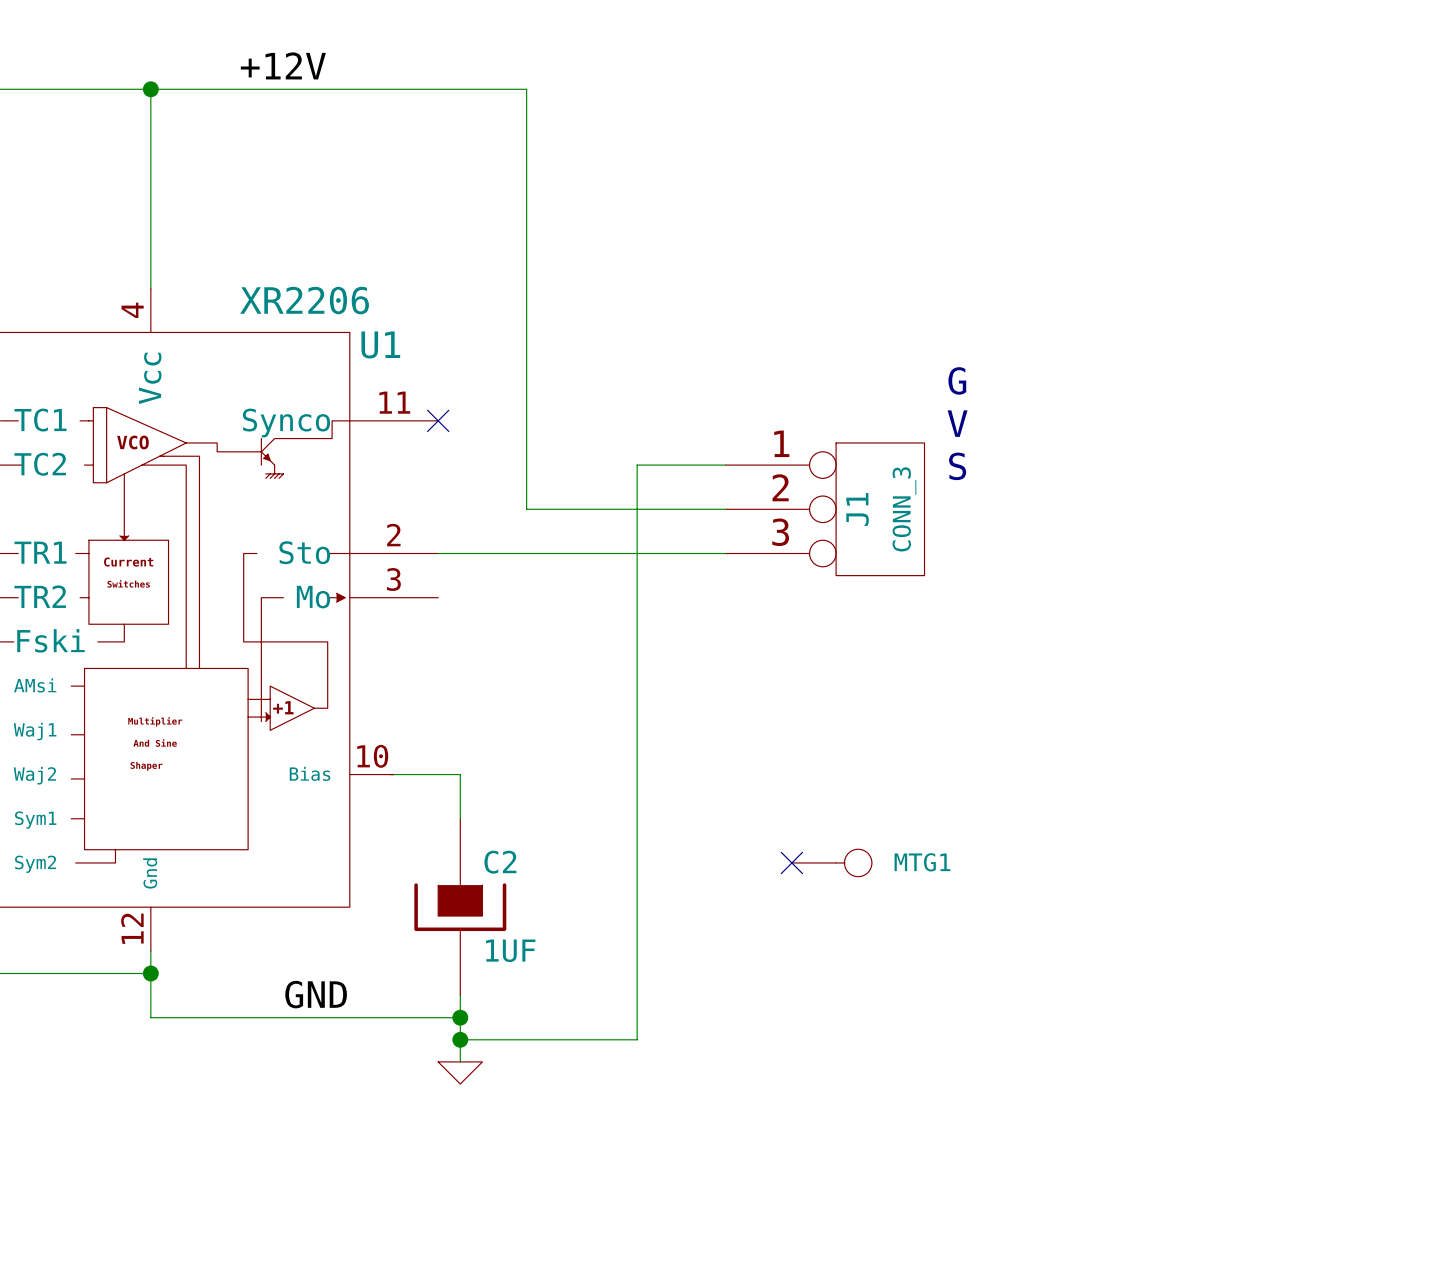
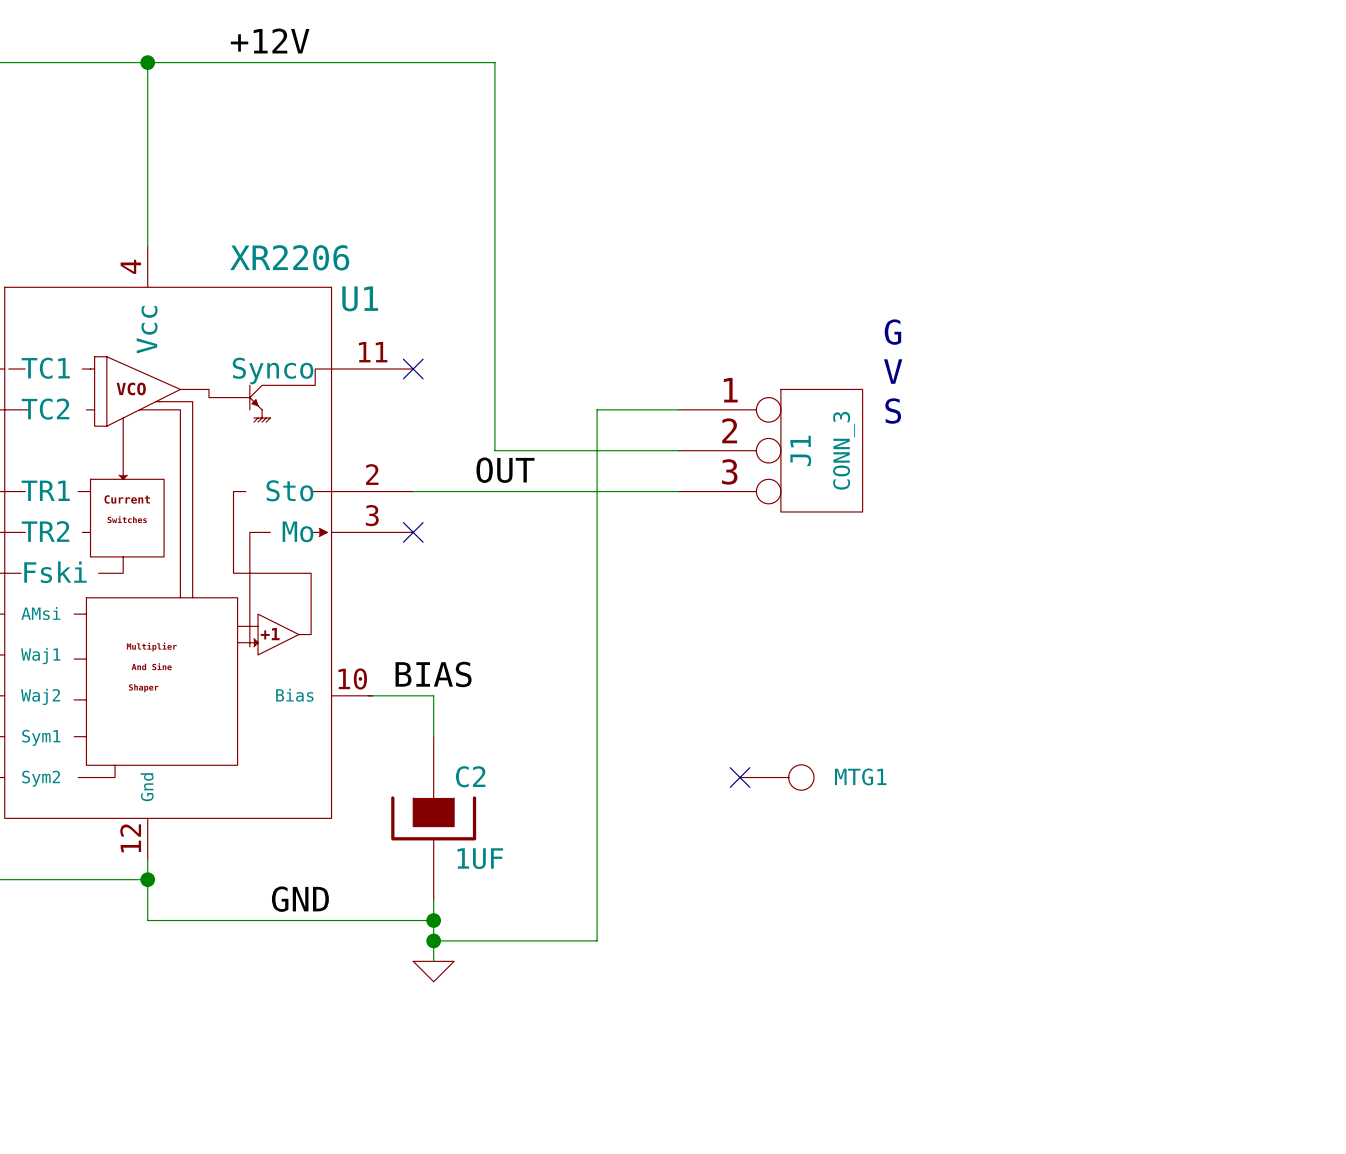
label: none -> OUT (505, 470)
no-connect mark: none -> (413, 532)
label: none -> BIAS (433, 674)

